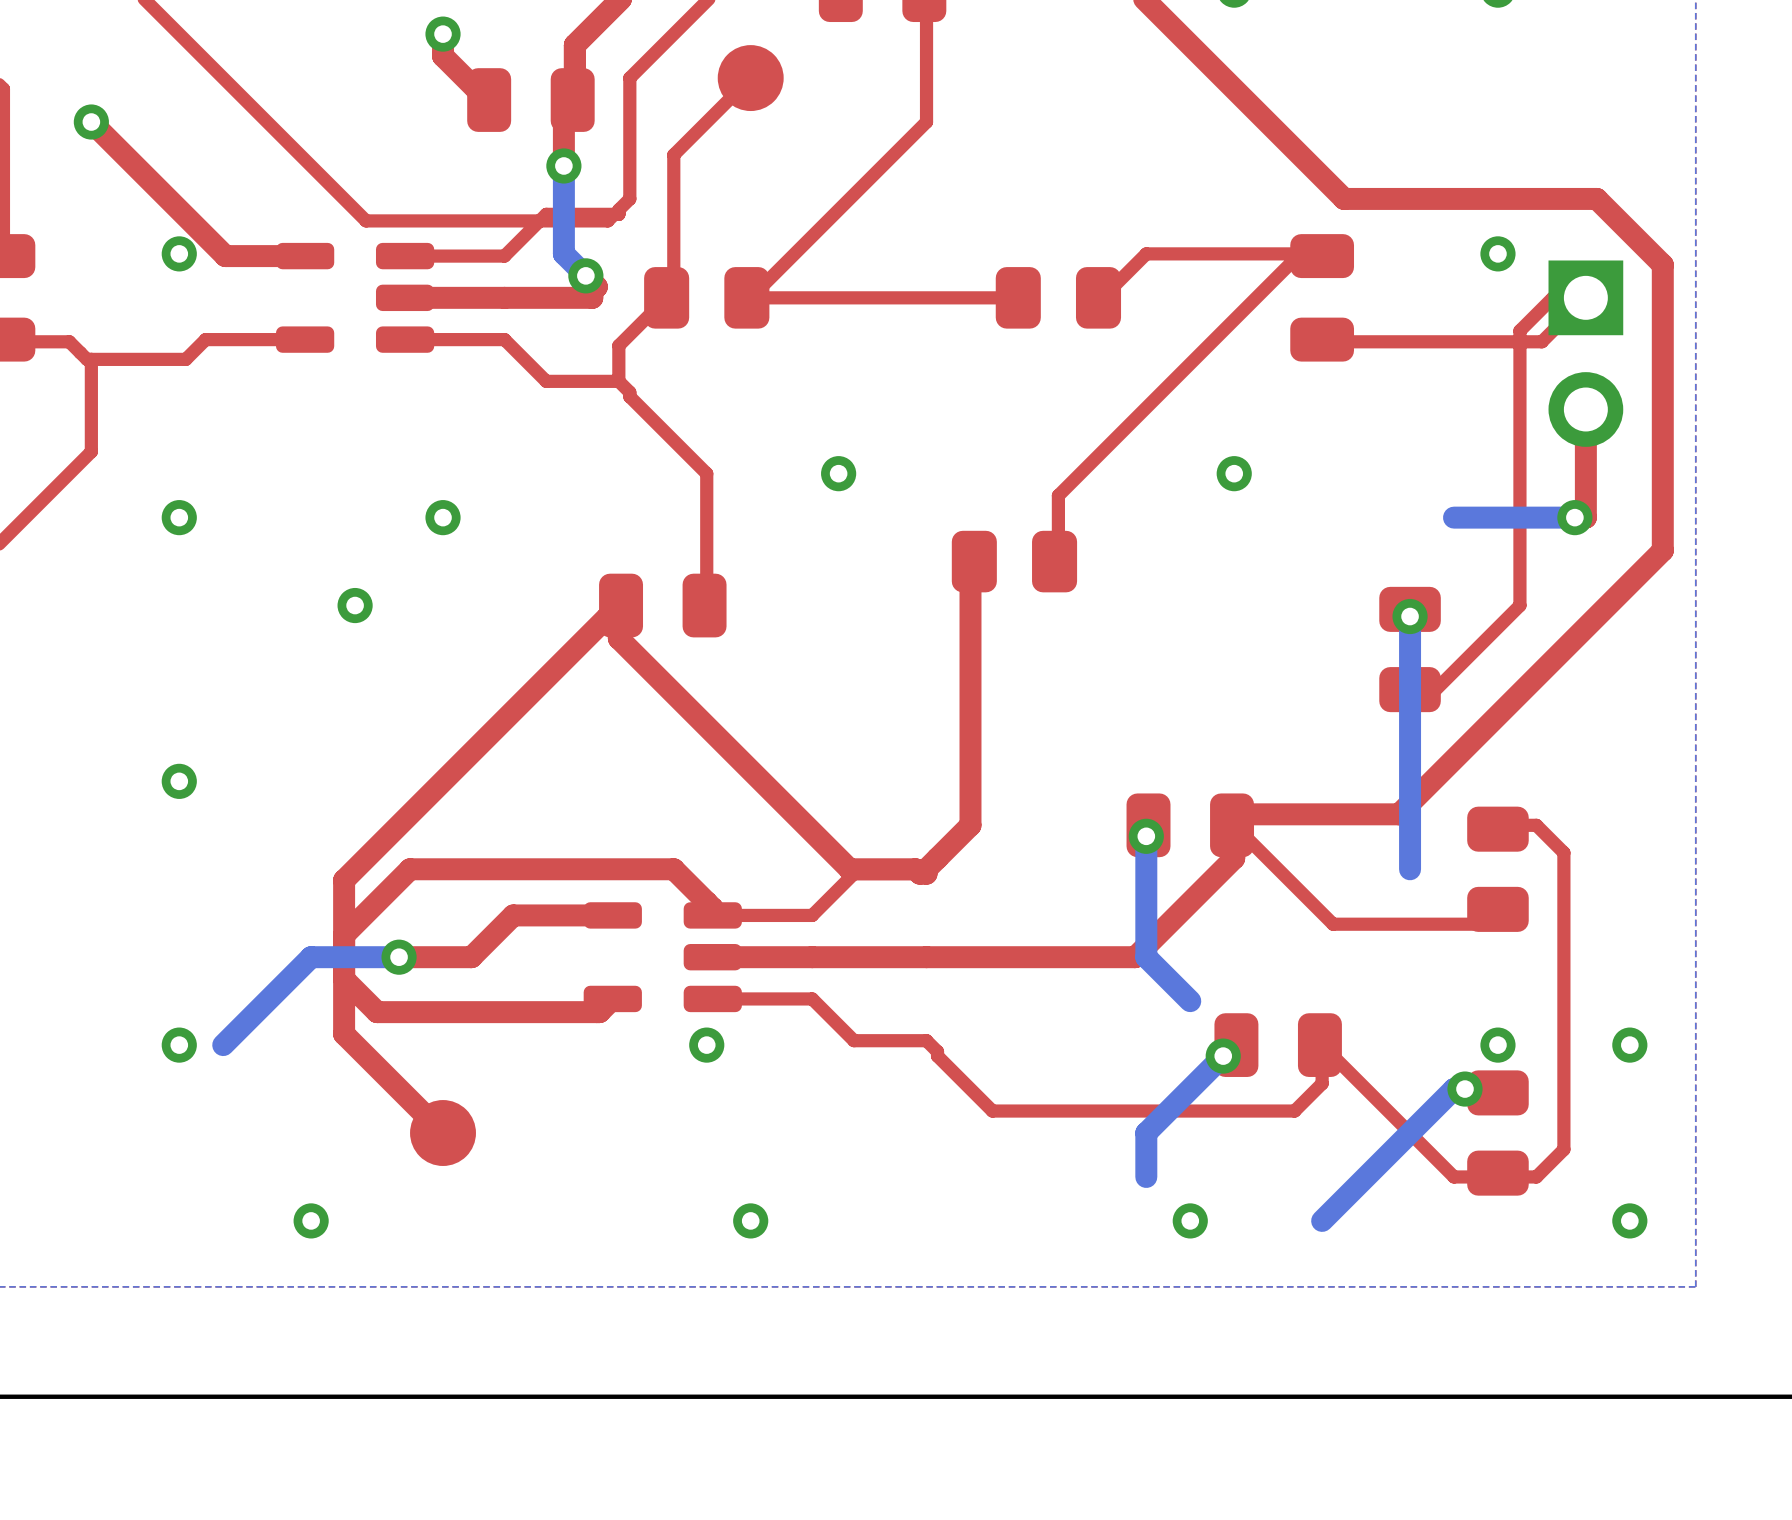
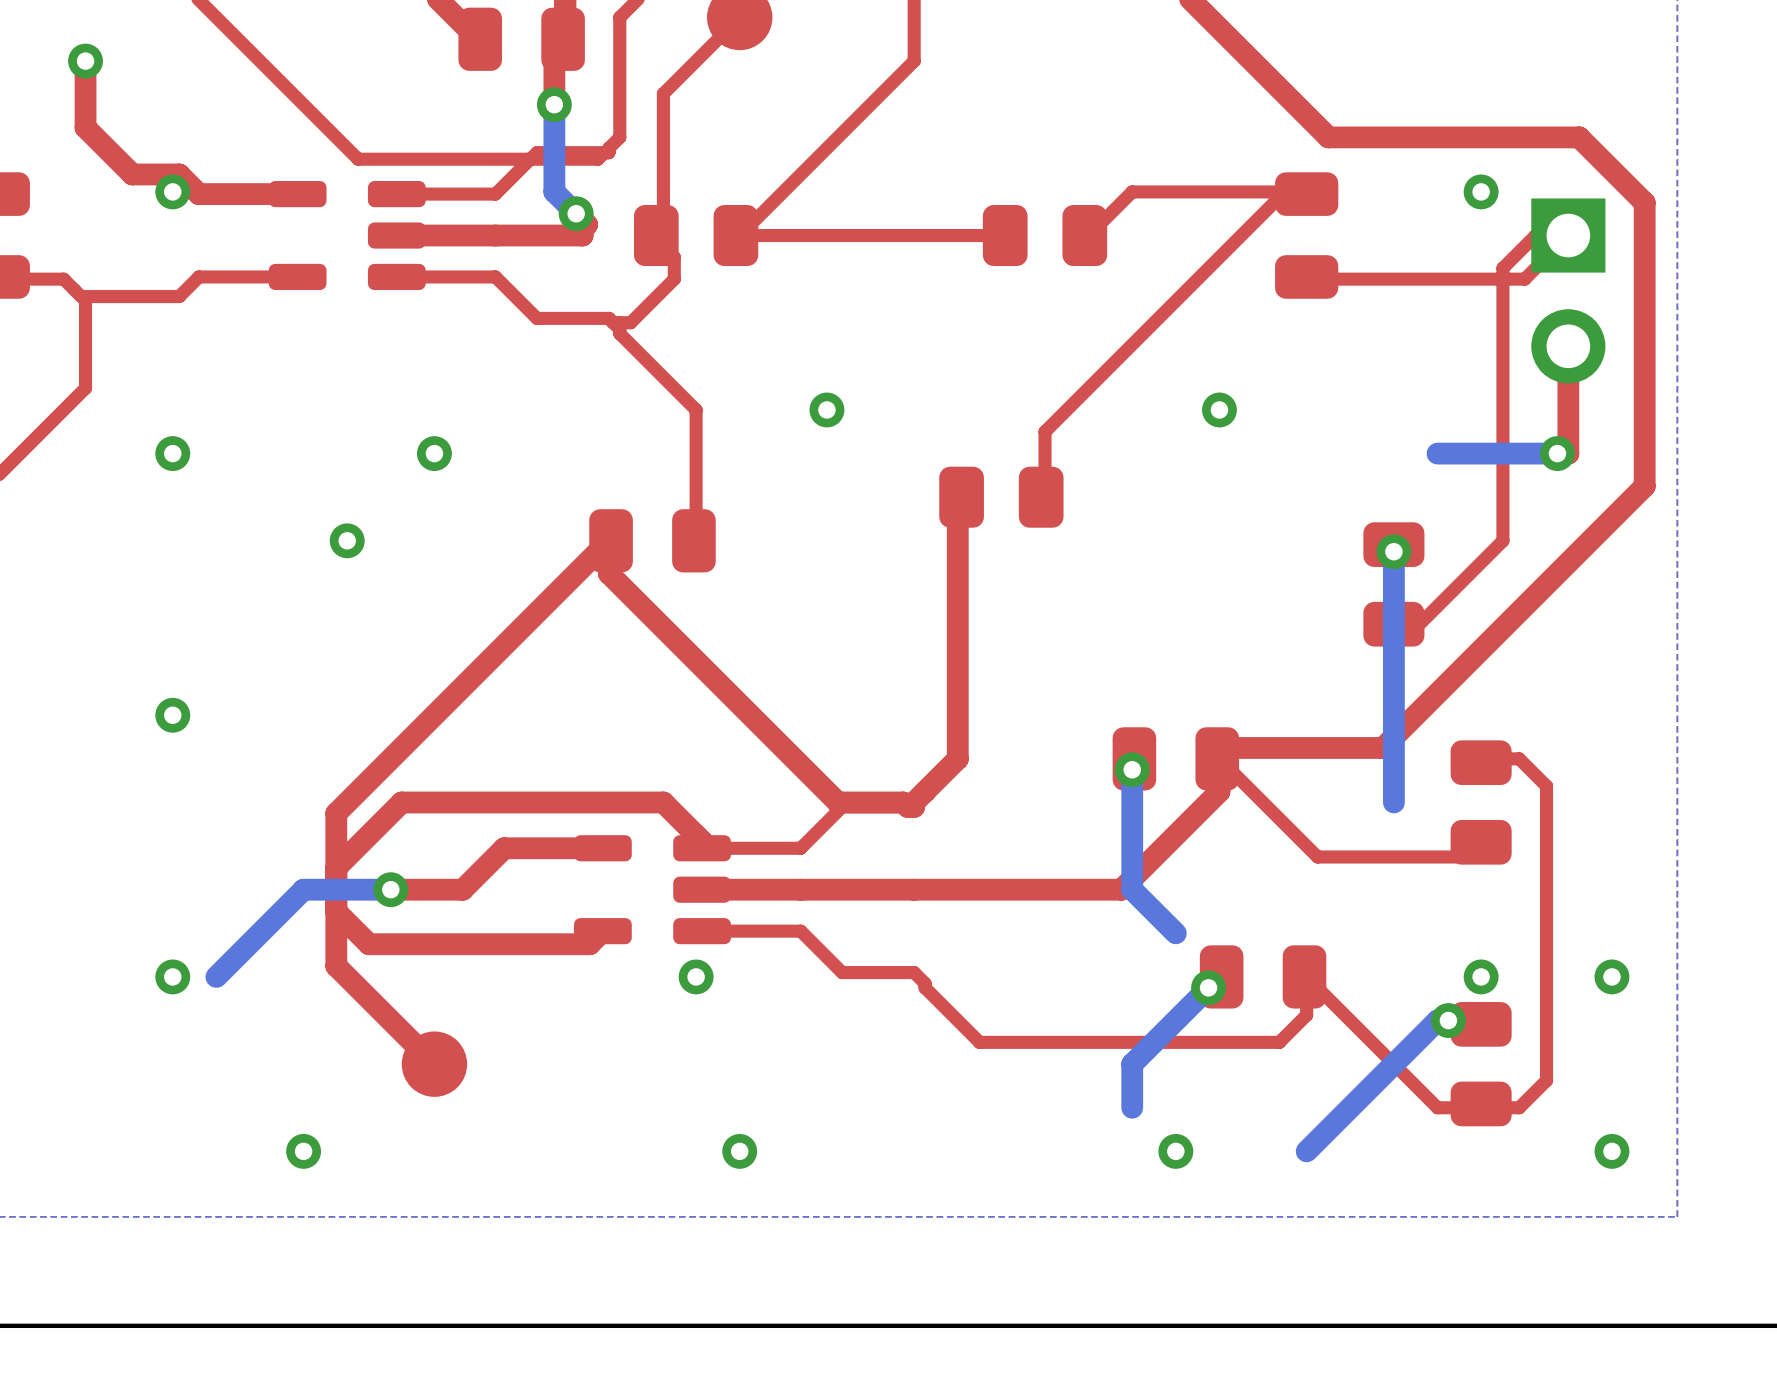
top track: (91, 122) (225, 256) -> (85, 61) (85, 127) (132, 174) (179, 174) (198, 194) (218, 194)
top track: (666, 297) (618, 345) (618, 381) -> (656, 235) (656, 239) (674, 257) (674, 279) (630, 322) (613, 322)

